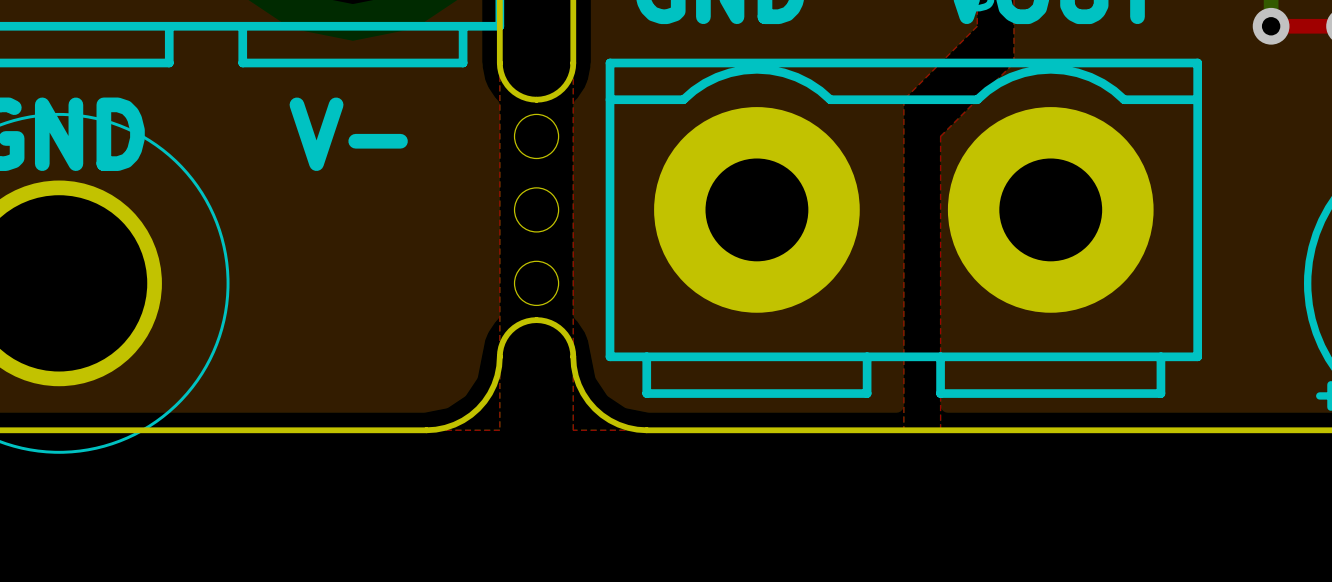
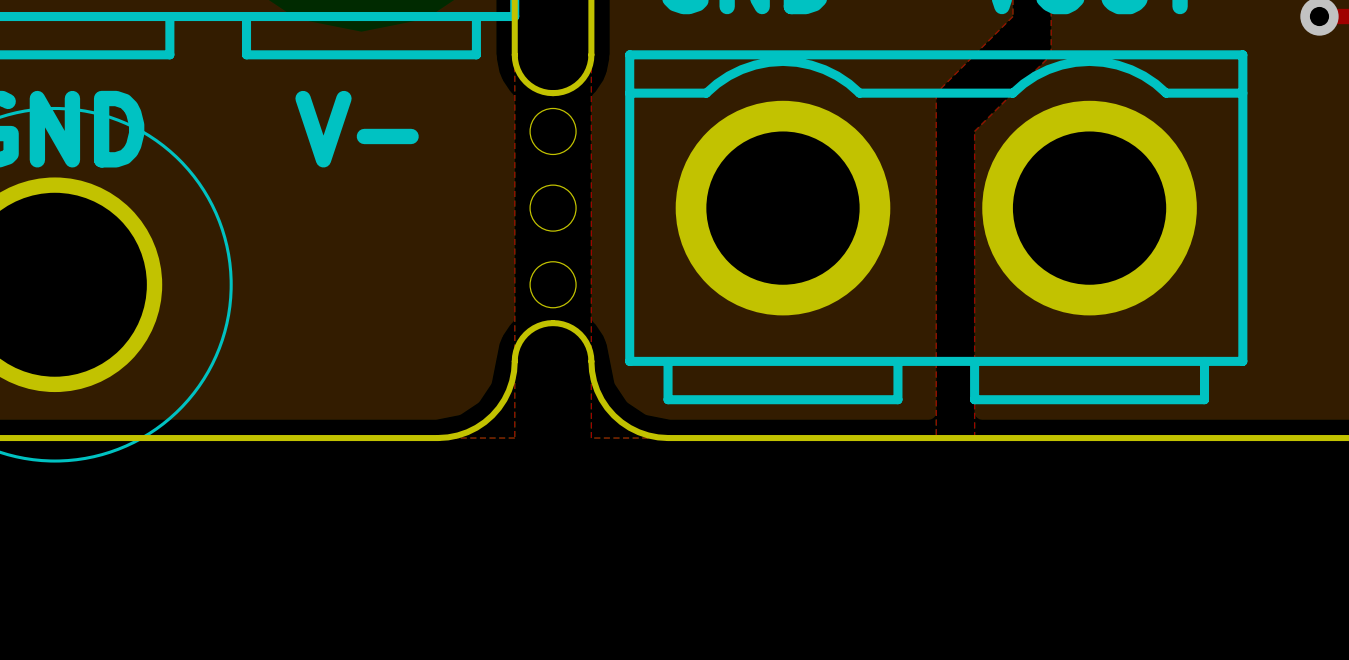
part footprint: [605, 58, 1203, 398] -> [625, 50, 1248, 405]

